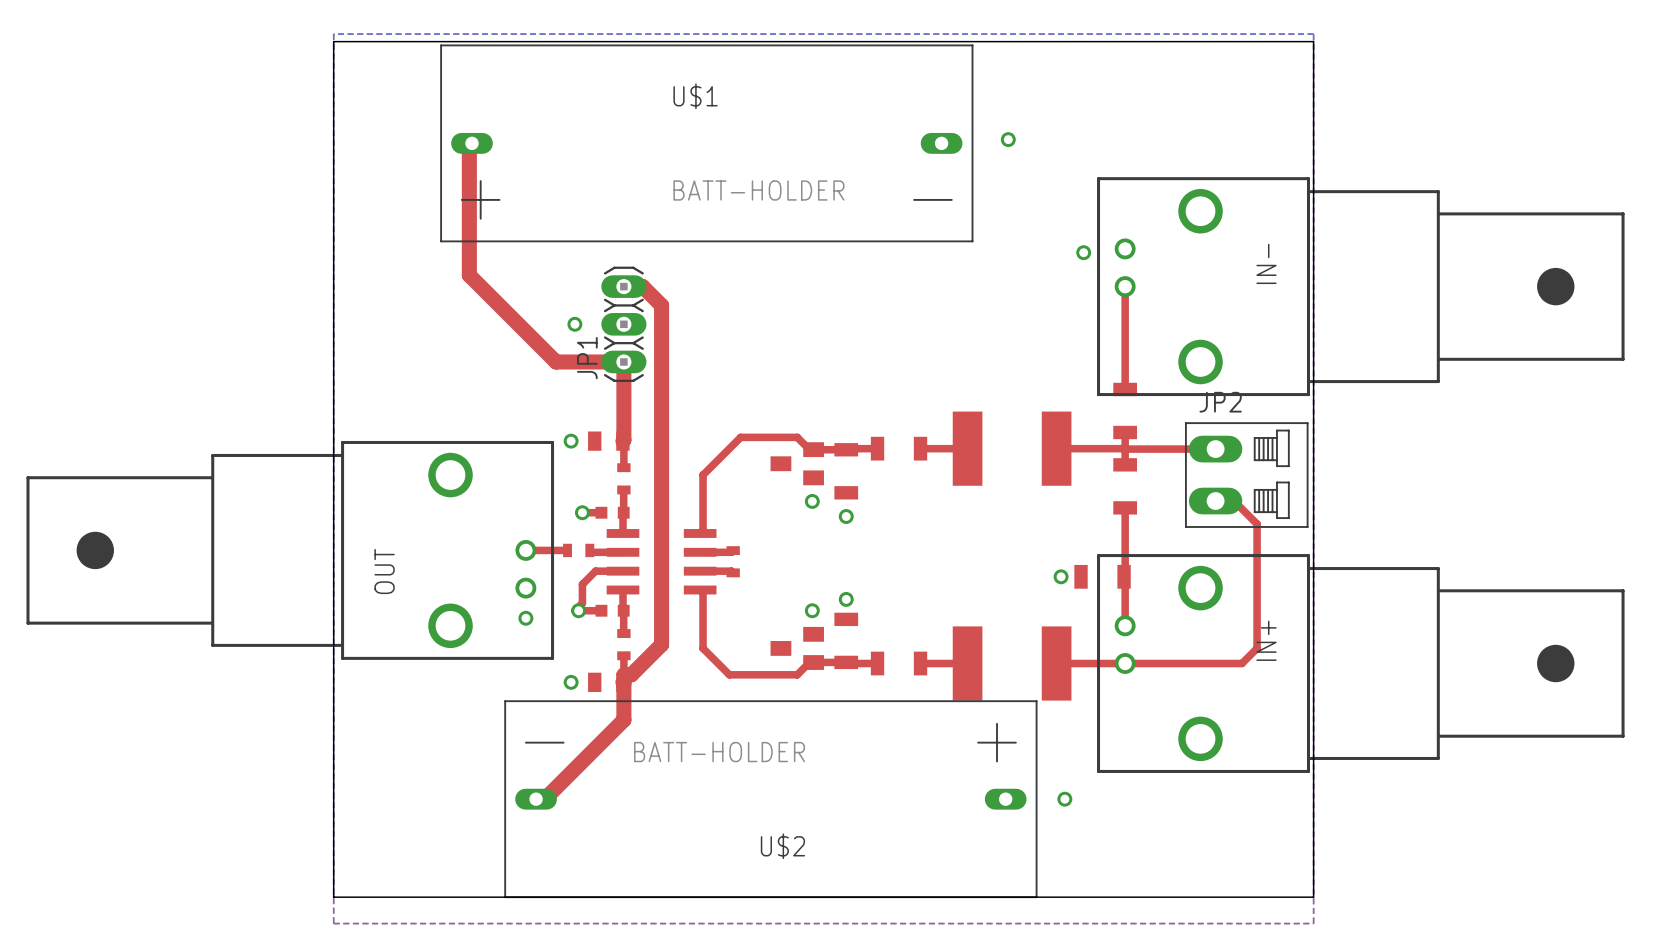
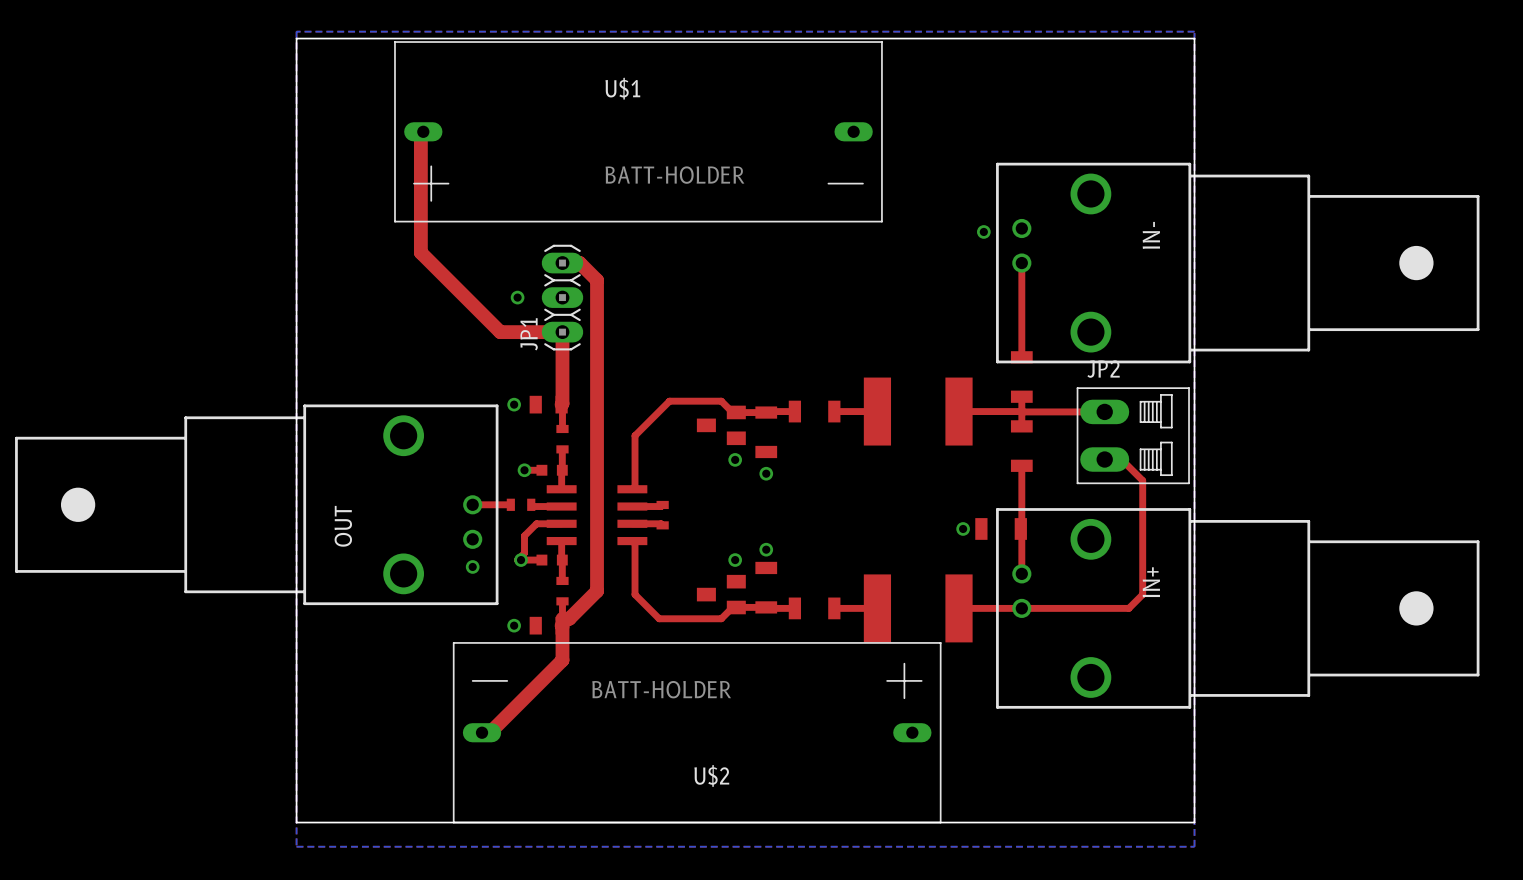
via: (1008, 139) -> none
via: (1064, 799) -> none

